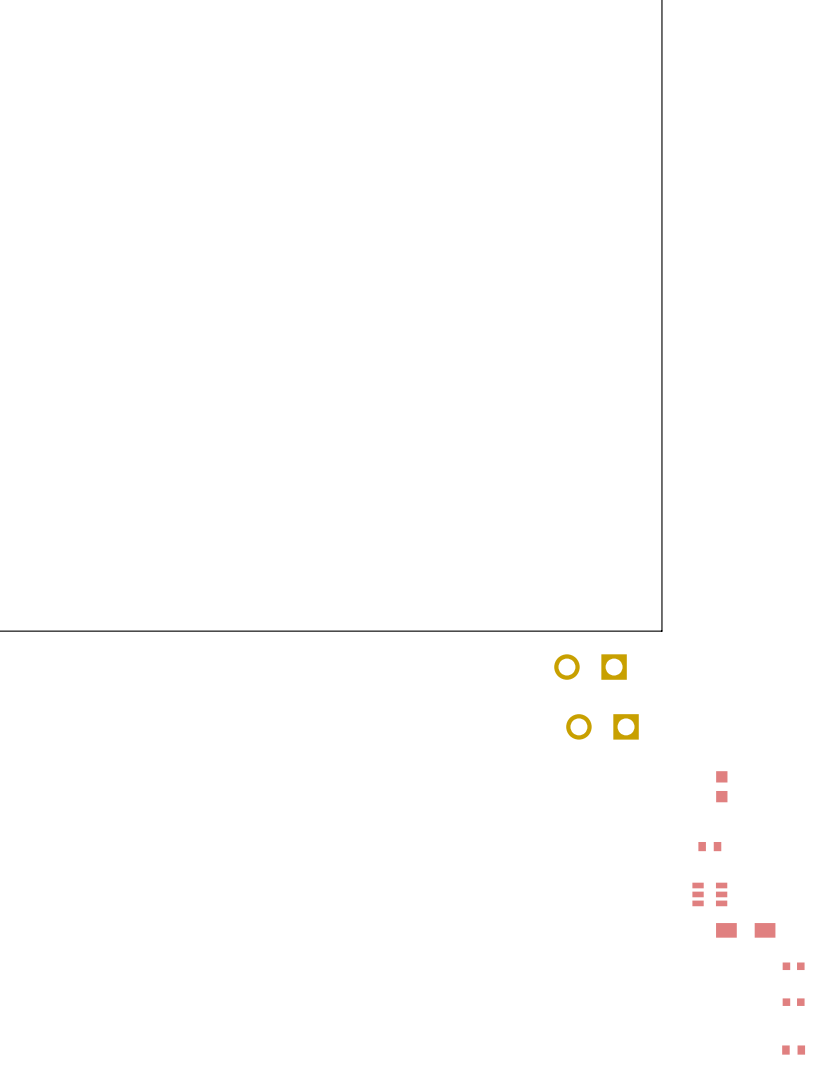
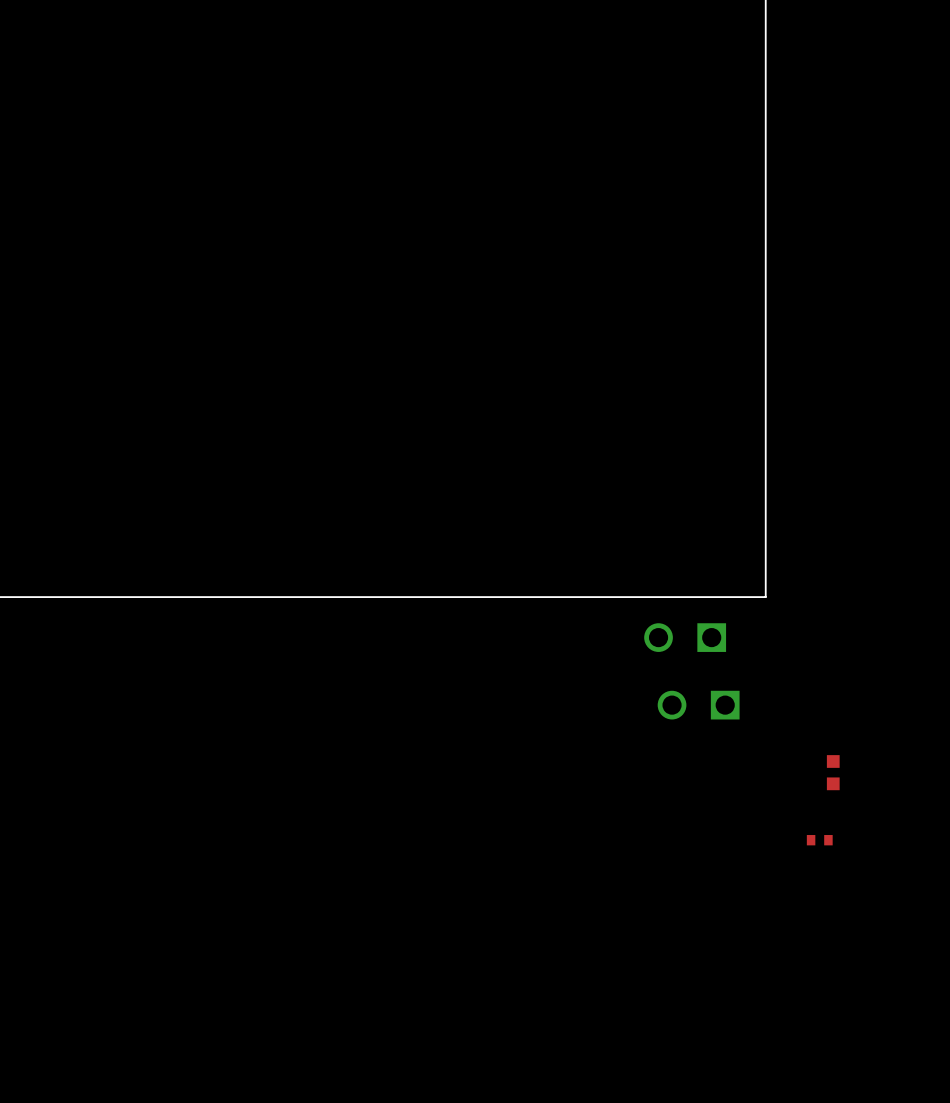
part: (709, 894) -> none
part: (745, 930) -> none
part: (793, 966) -> none
part: (793, 1002) -> none
part: (793, 1050) -> none

